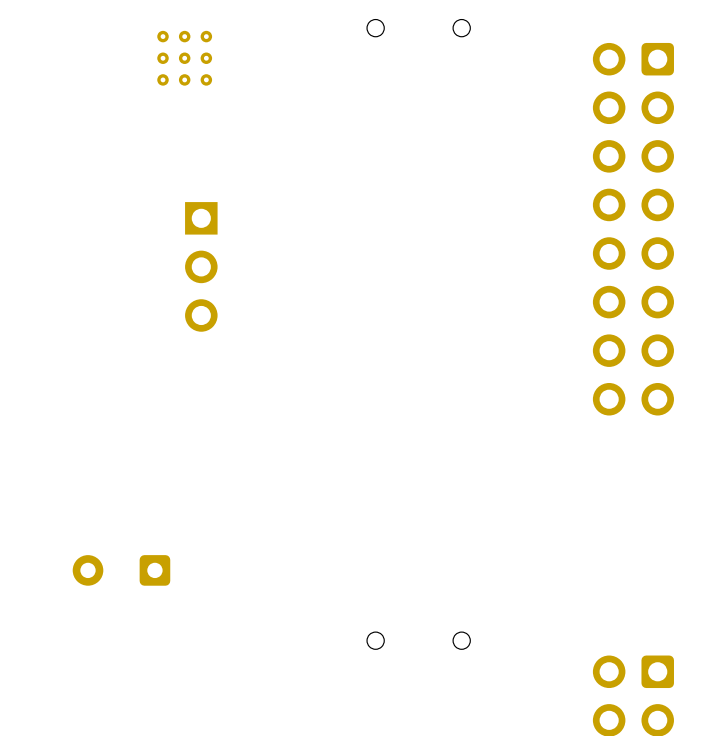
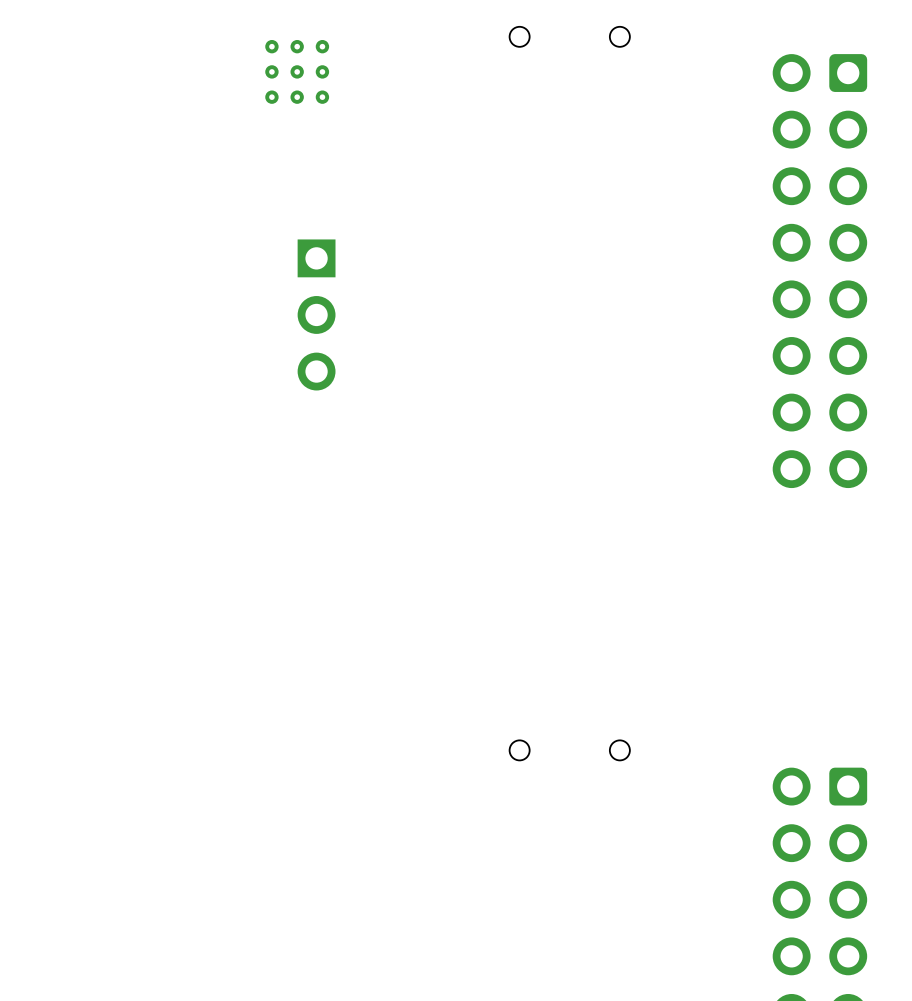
part: (121, 570) -> none

